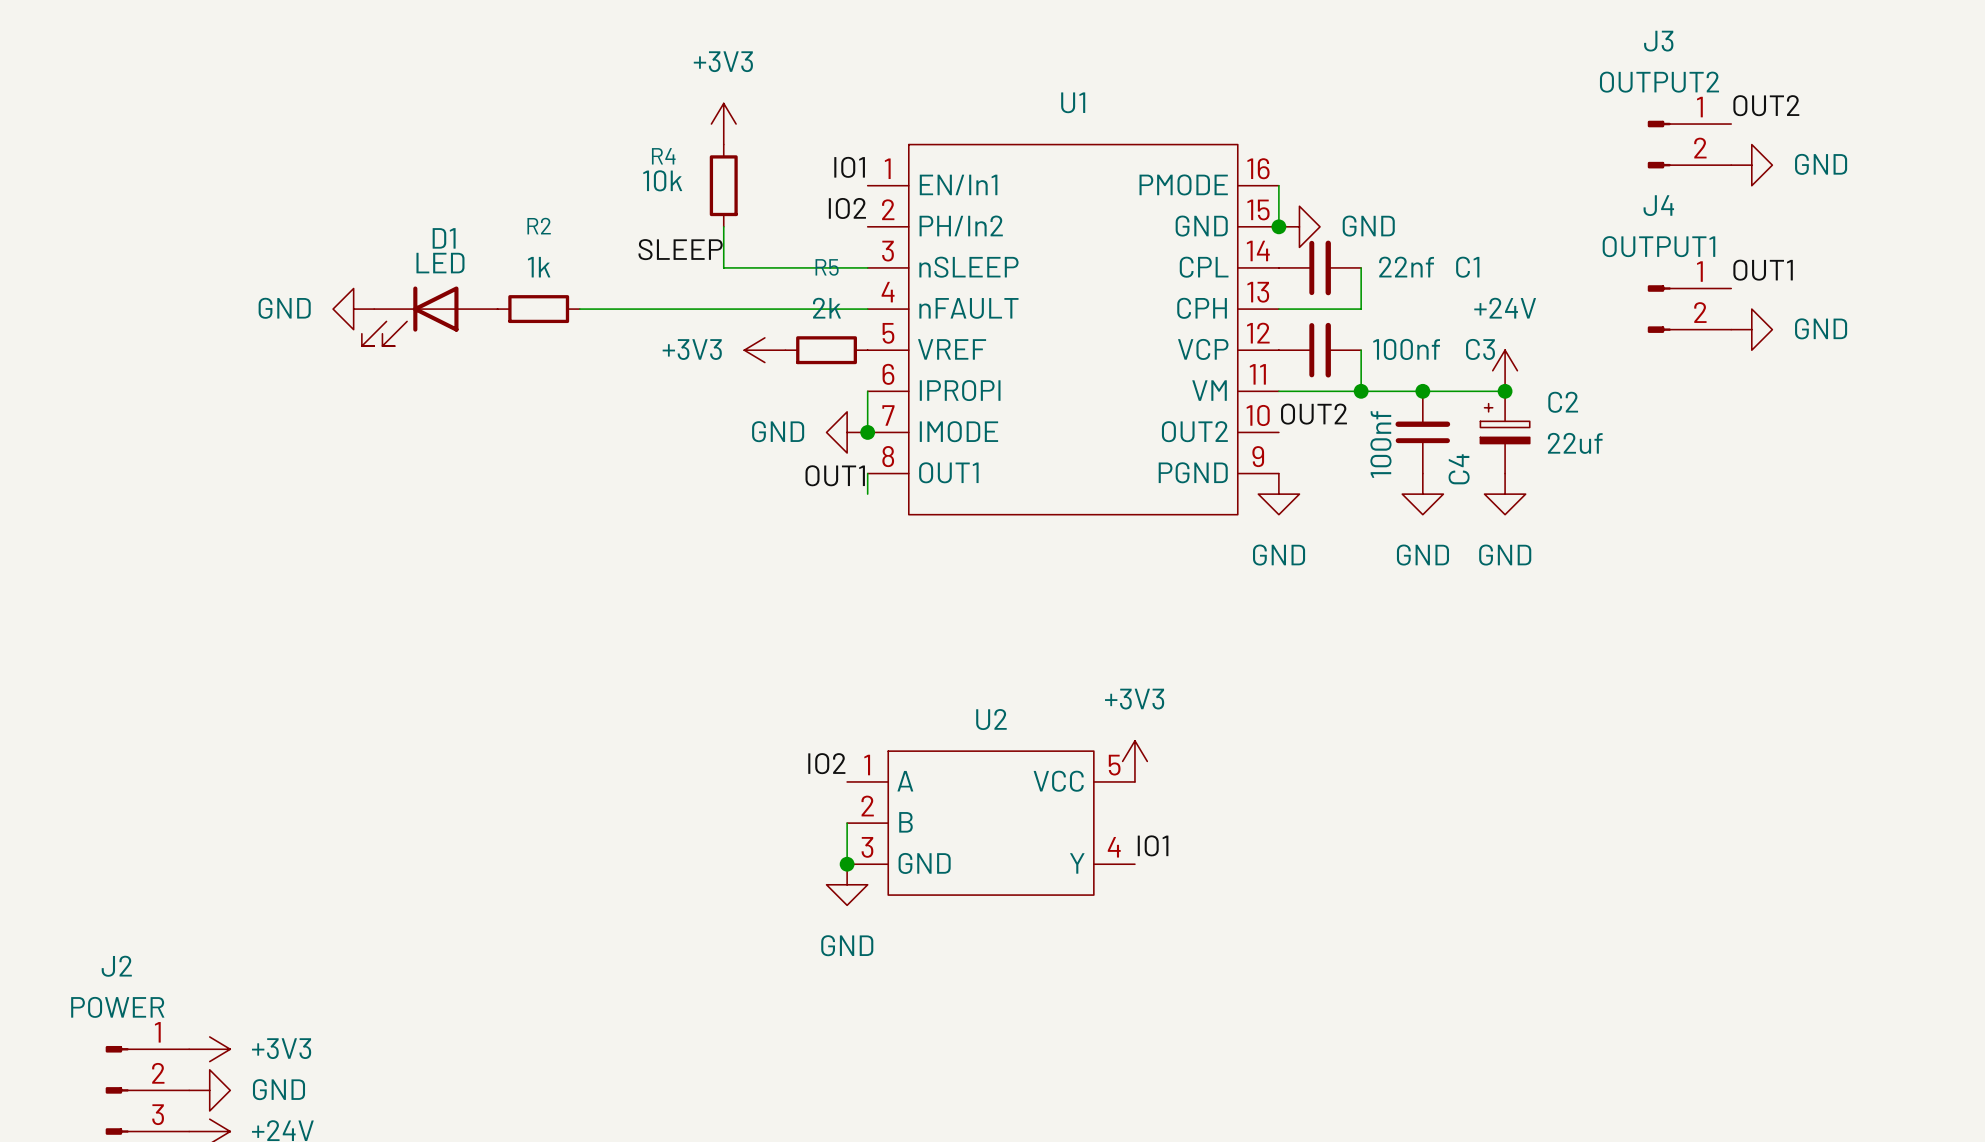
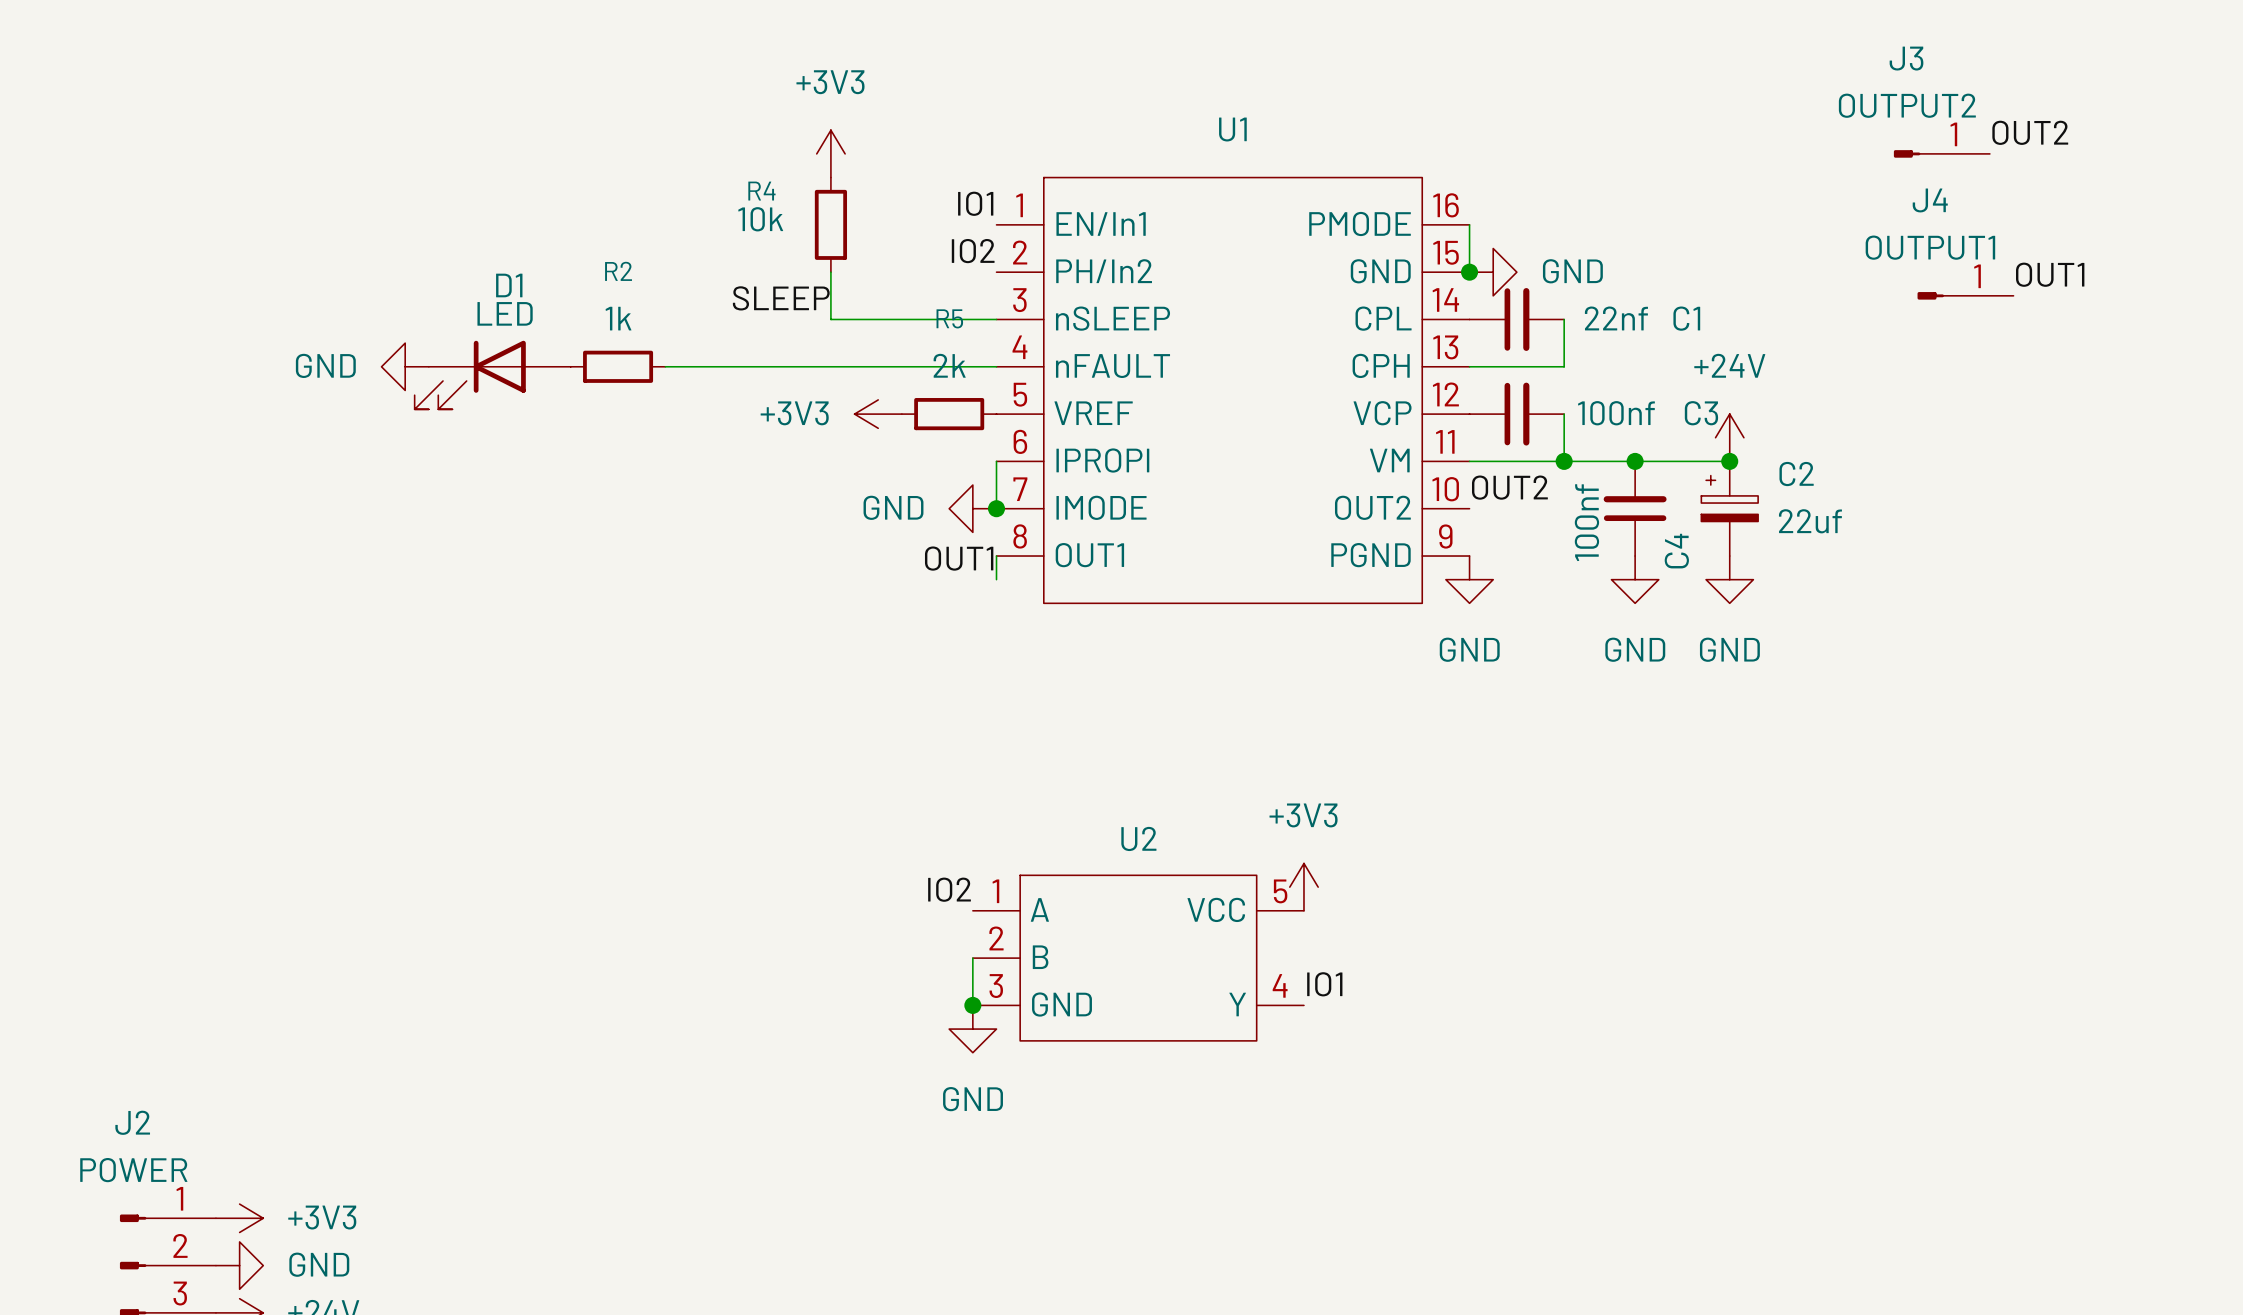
J3 symbol: [1647, 120, 1732, 169] -> [1893, 150, 1990, 158]
power symbol: GND (1751, 165) -> none
label position: OUT1 (1763, 270) -> OUT1 (2050, 274)
J4 symbol: [1647, 285, 1732, 333] -> [1917, 292, 2014, 300]
power symbol: GND (1751, 329) -> none

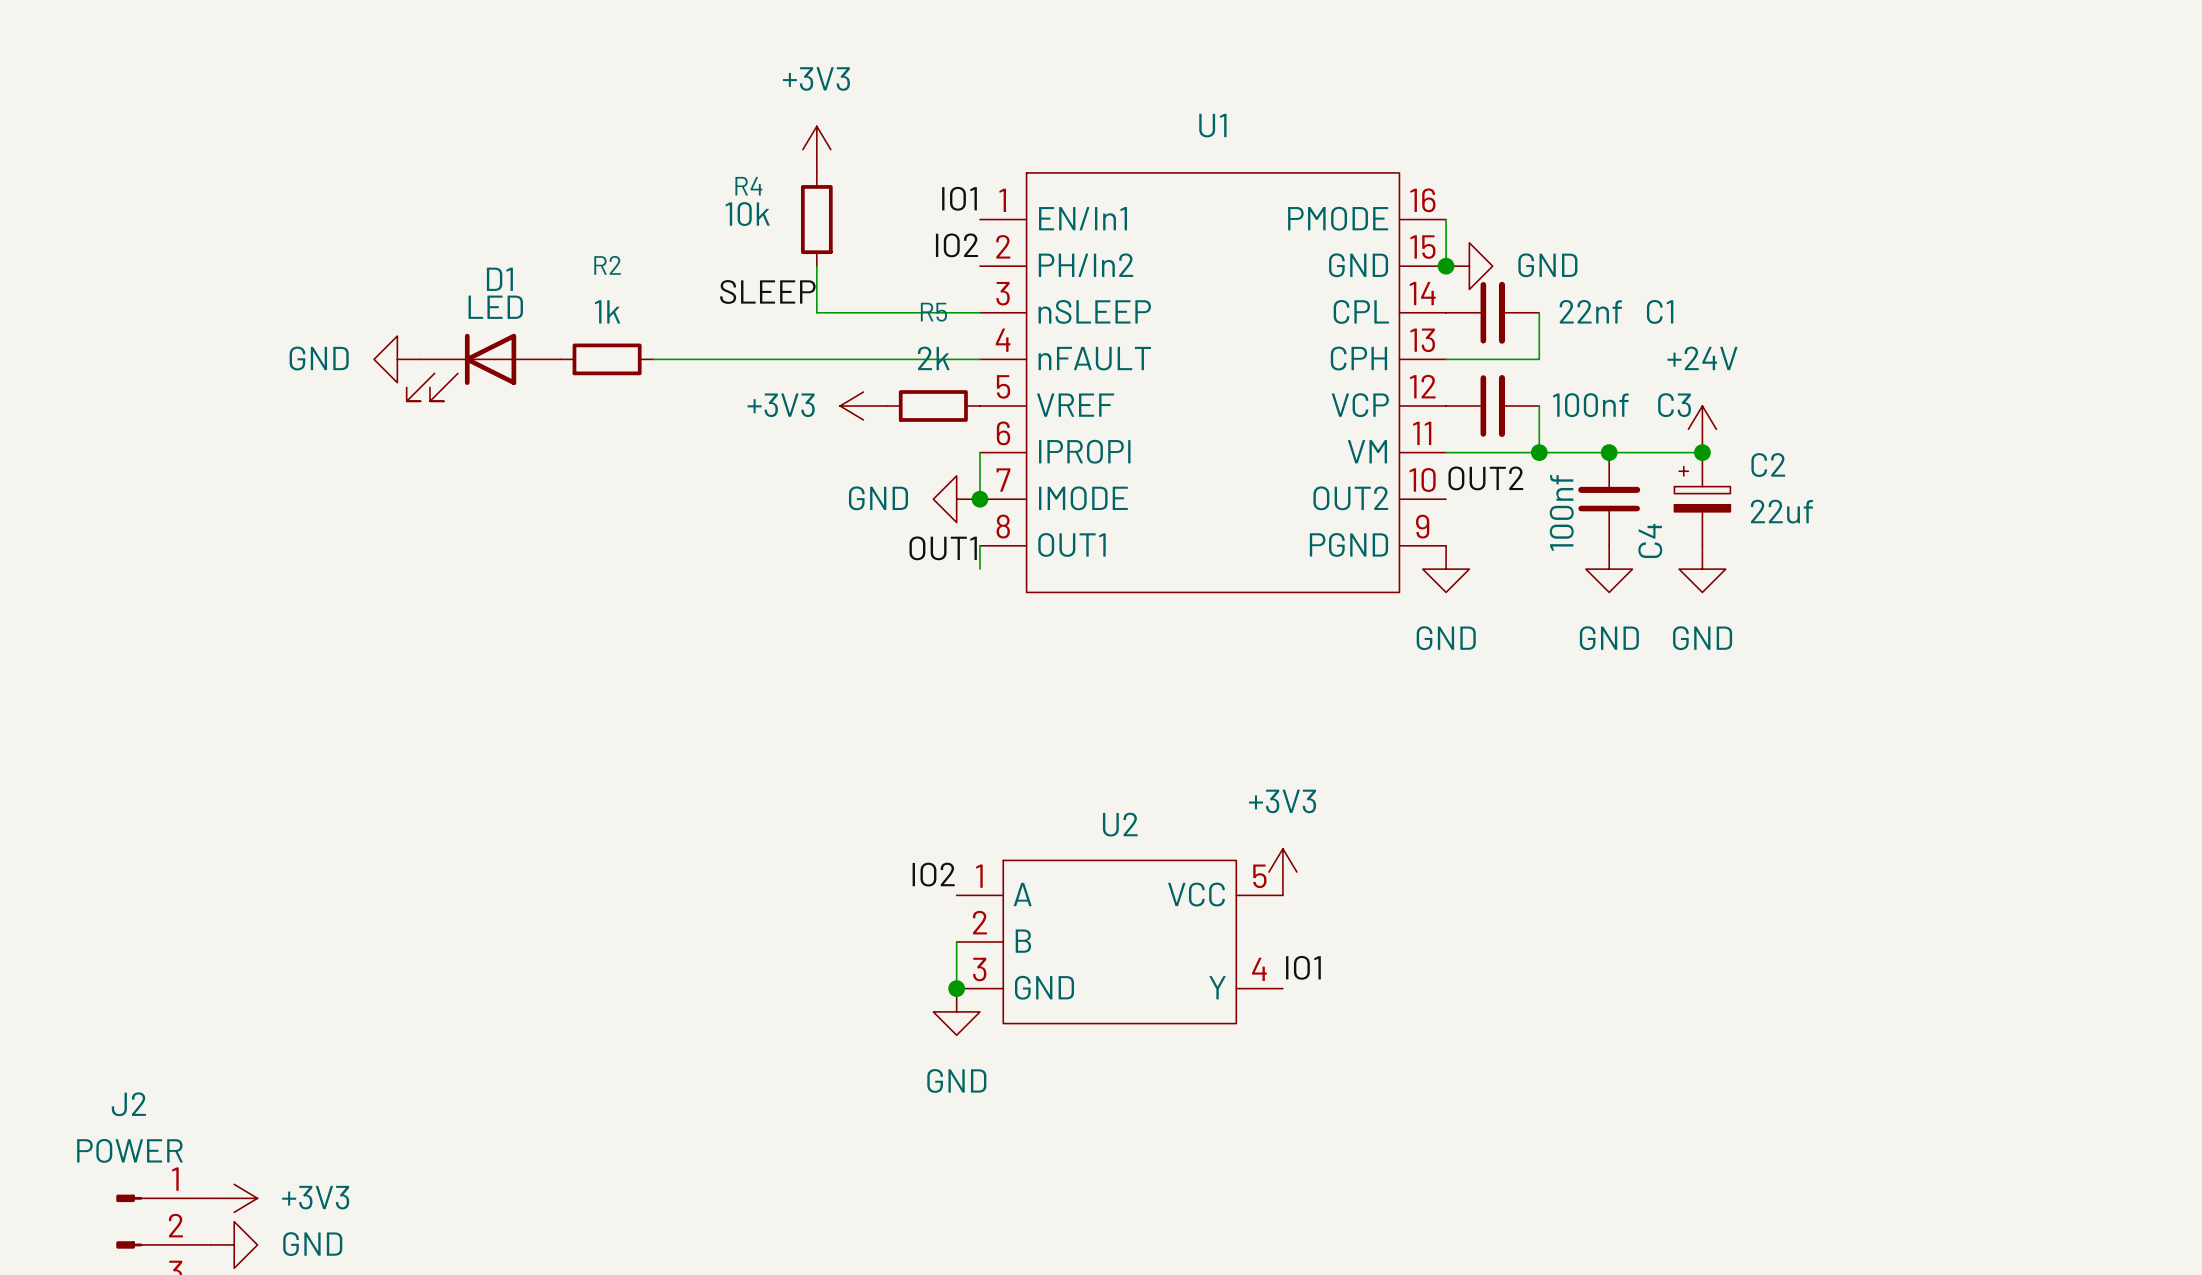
label: OUT2 (2030, 132) -> none
J3: OUTPUT2 (1941, 153) -> none
label: OUT1 (2050, 274) -> none
J4: OUTPUT1 (1965, 295) -> none

